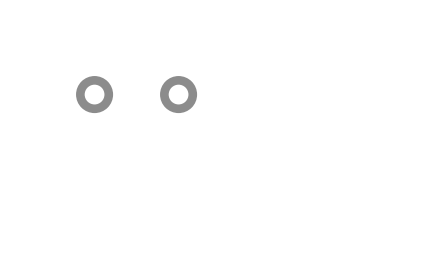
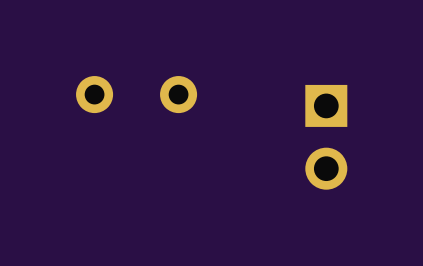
part: none -> (326, 137)

